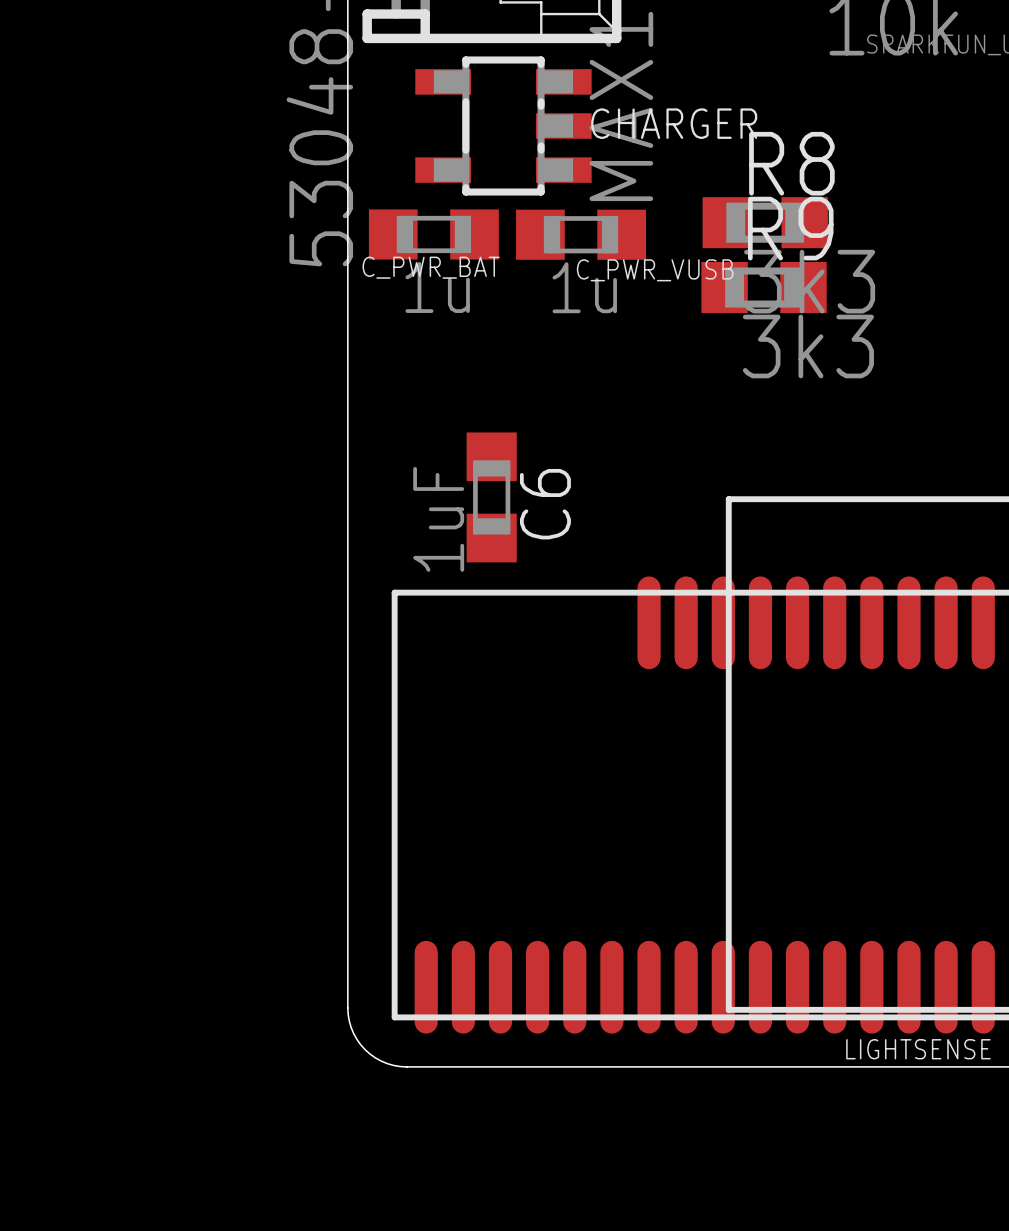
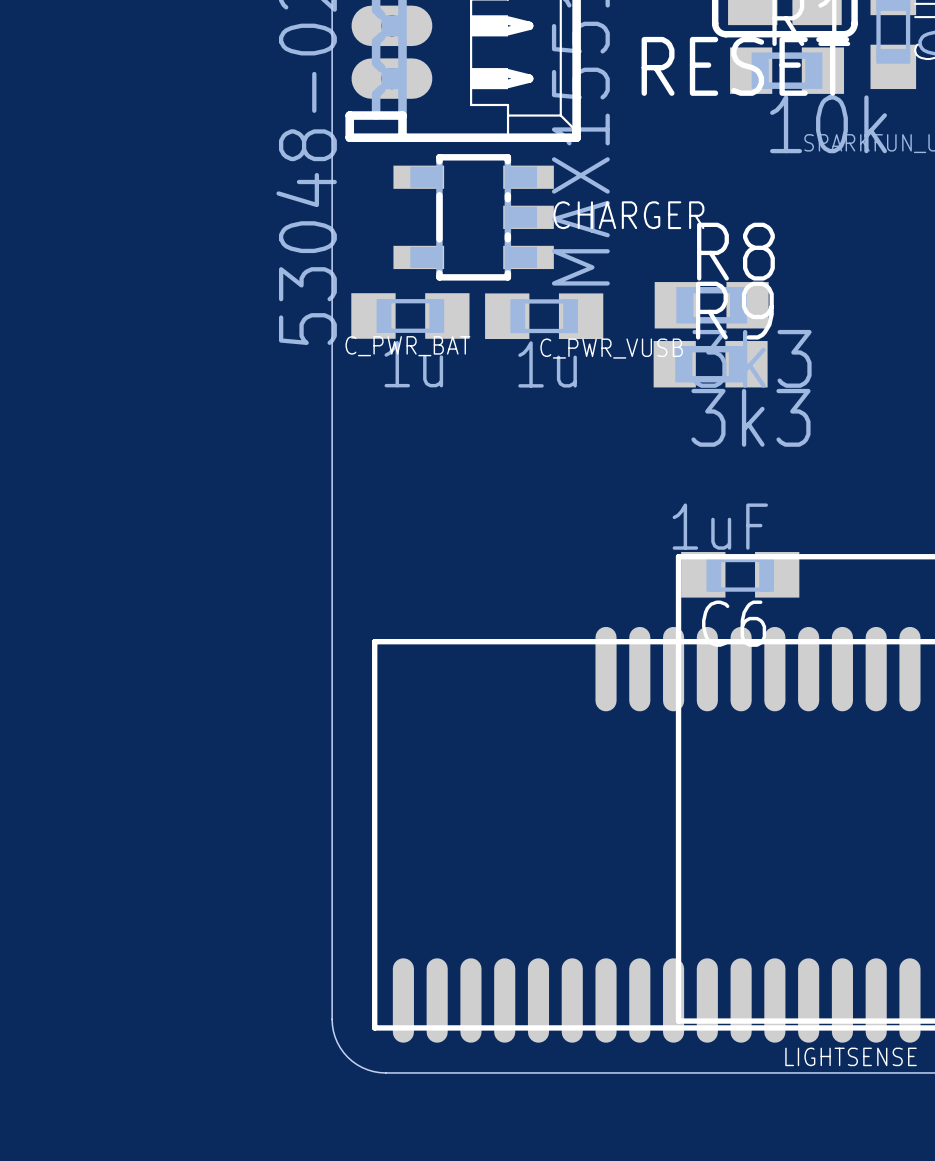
C6 rotation: 0° (491, 497) -> 90° clockwise (740, 574)
C6 position: (491, 497) -> (740, 574)

